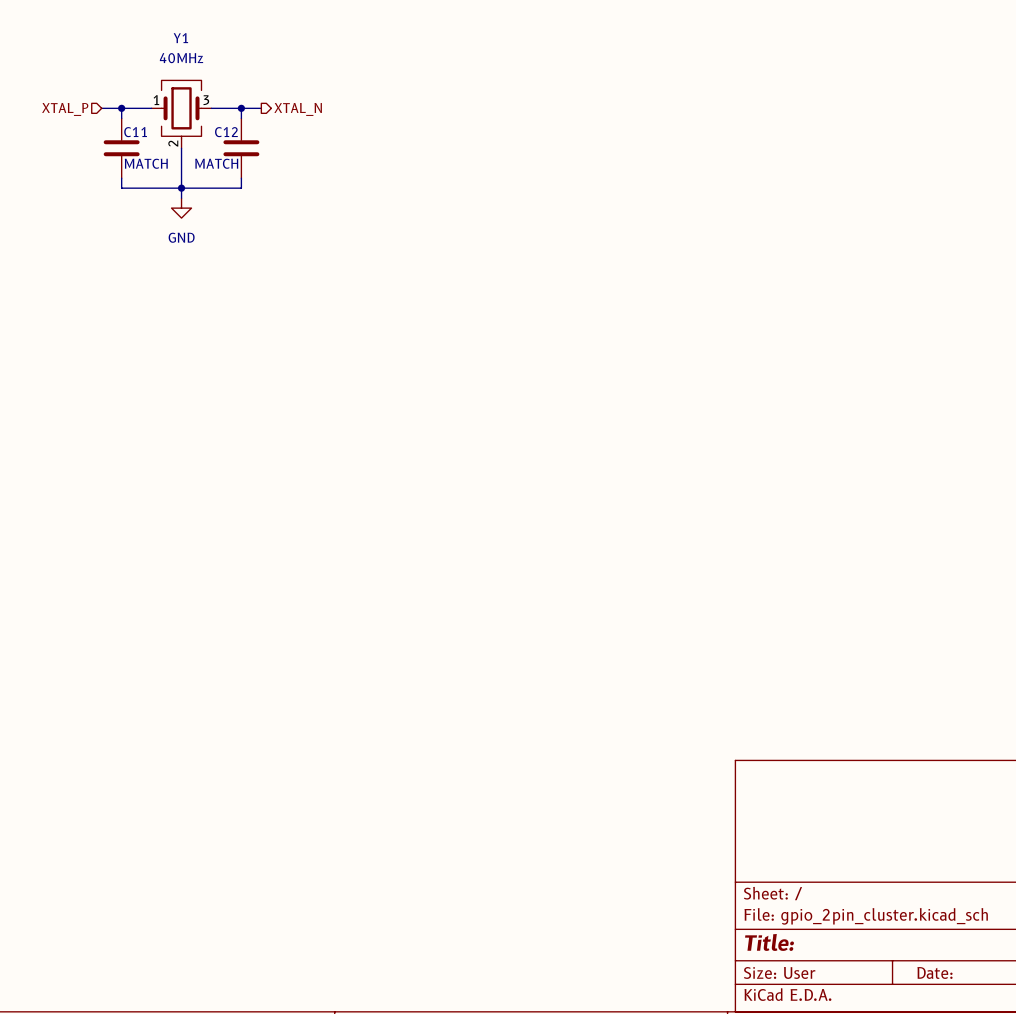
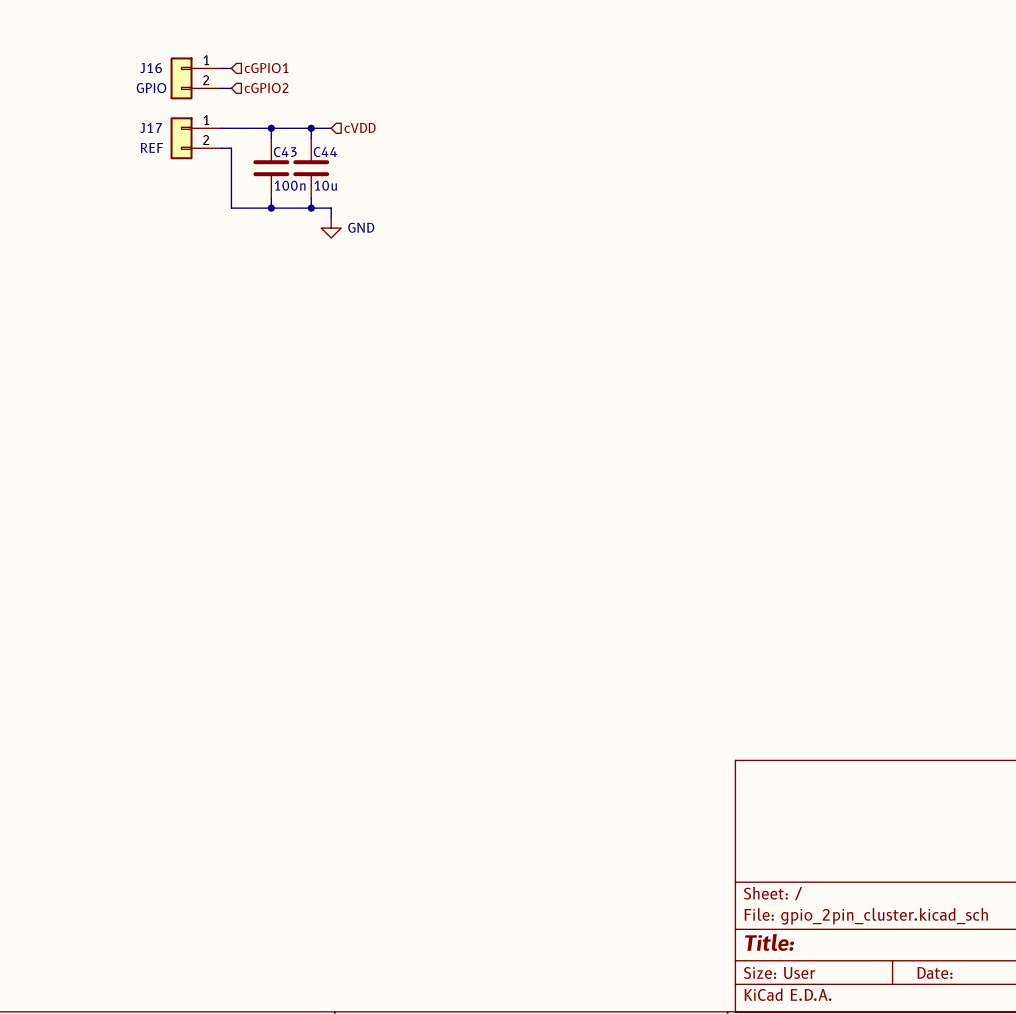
wire: none -> (221, 68) (231, 68)
hierarchical label: none -> cGPIO1 (266, 68)
J16: none -> GPIO (195, 78)
wire: none -> (221, 88) (231, 88)
hierarchical label: none -> cGPIO2 (266, 88)
wire: (101, 108) (151, 108) -> none
wire: (121, 108) (121, 118) -> (271, 198) (271, 208)
junction: (121, 108) -> none
wire: (211, 108) (261, 108) -> none
wire: (241, 108) (241, 118) -> (271, 128) (271, 138)
junction position: (241, 108) -> (271, 128)
hierarchical label: XTAL_P (65, 109) -> none
hierarchical label: XTAL_N (298, 109) -> none
Y1: 40MHz (181, 114) -> none
hierarchical label: none -> cVDD (360, 127)
wire: none -> (221, 128) (331, 128)
wire: none -> (311, 128) (311, 138)
junction: none -> (311, 128)
J17: none -> REF (195, 138)
C11: MATCH (121, 148) -> none
wire: (181, 148) (181, 198) -> none
wire: none -> (221, 148) (231, 148) (231, 208) (331, 208) (331, 218)
C12: MATCH (241, 148) -> none
C43: none -> 100n (271, 168)
C44: none -> 10u (311, 168)
wire: (121, 178) (121, 188) (241, 188) (241, 178) -> none
junction: (181, 188) -> none
wire: none -> (311, 198) (311, 208)
power symbol position: GND (181, 208) -> GND (331, 228)
junction: none -> (271, 208)
junction: none -> (311, 208)
power symbol text position: GND (181, 237) -> GND (361, 227)

